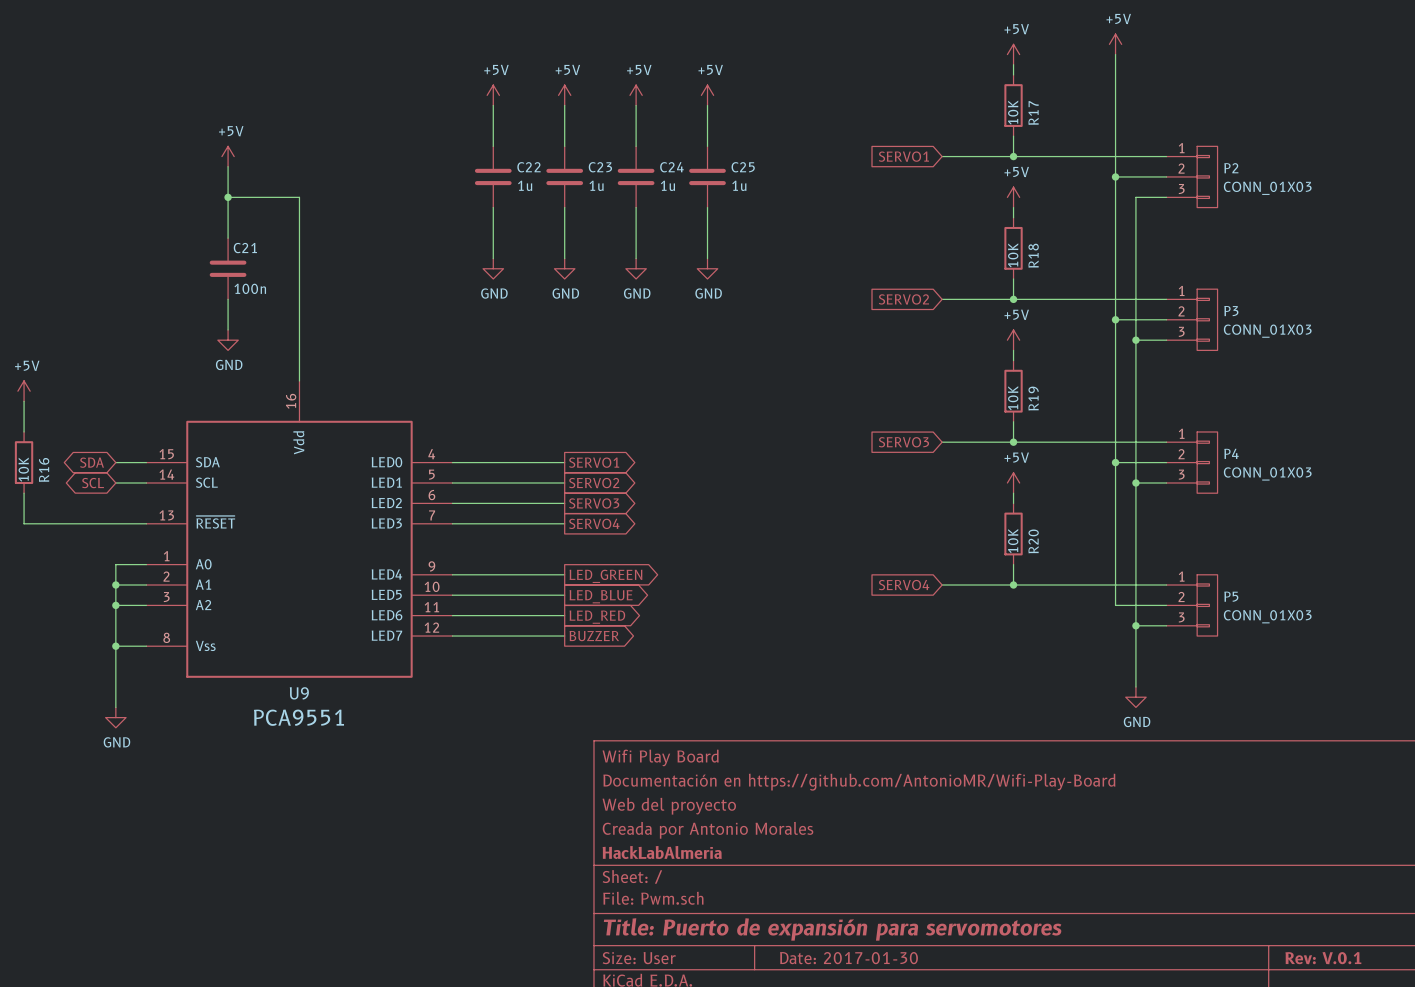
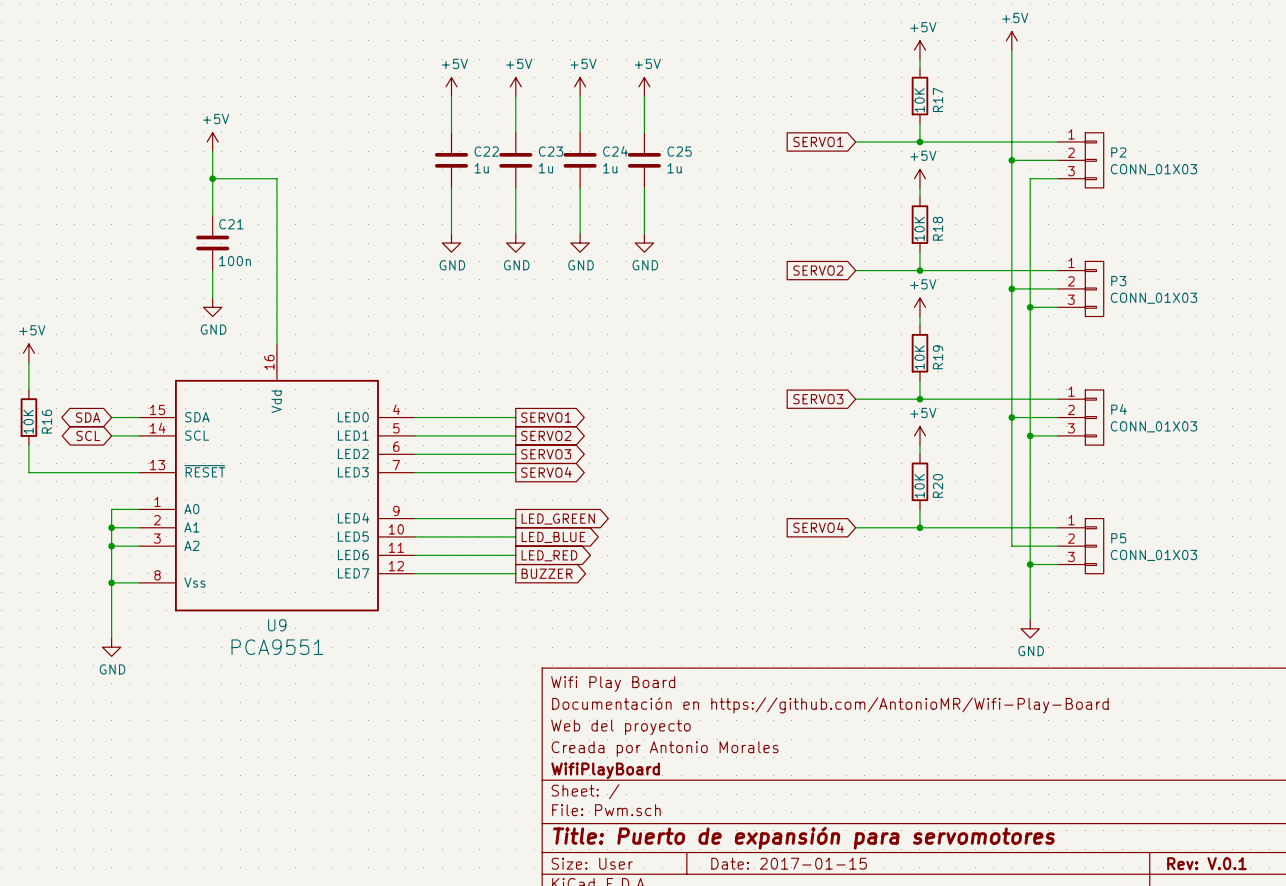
title block: HackLabAlmeria (662, 852) -> WifiPlayBoard (605, 770)
title block: Date: 2017-01-30 (849, 958) -> Date: 2017-01-15 (789, 863)

